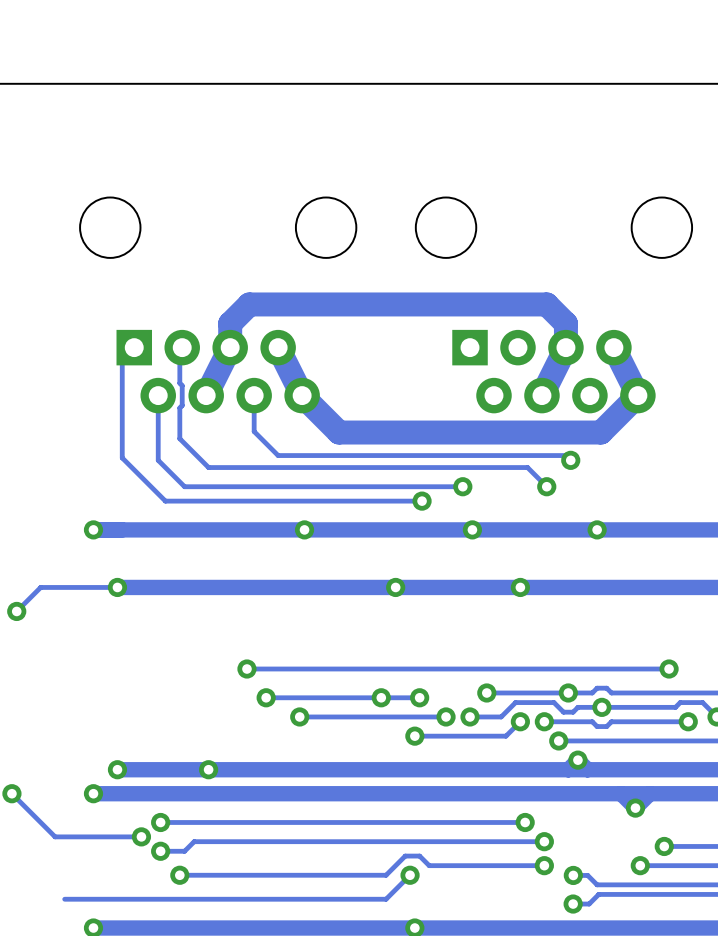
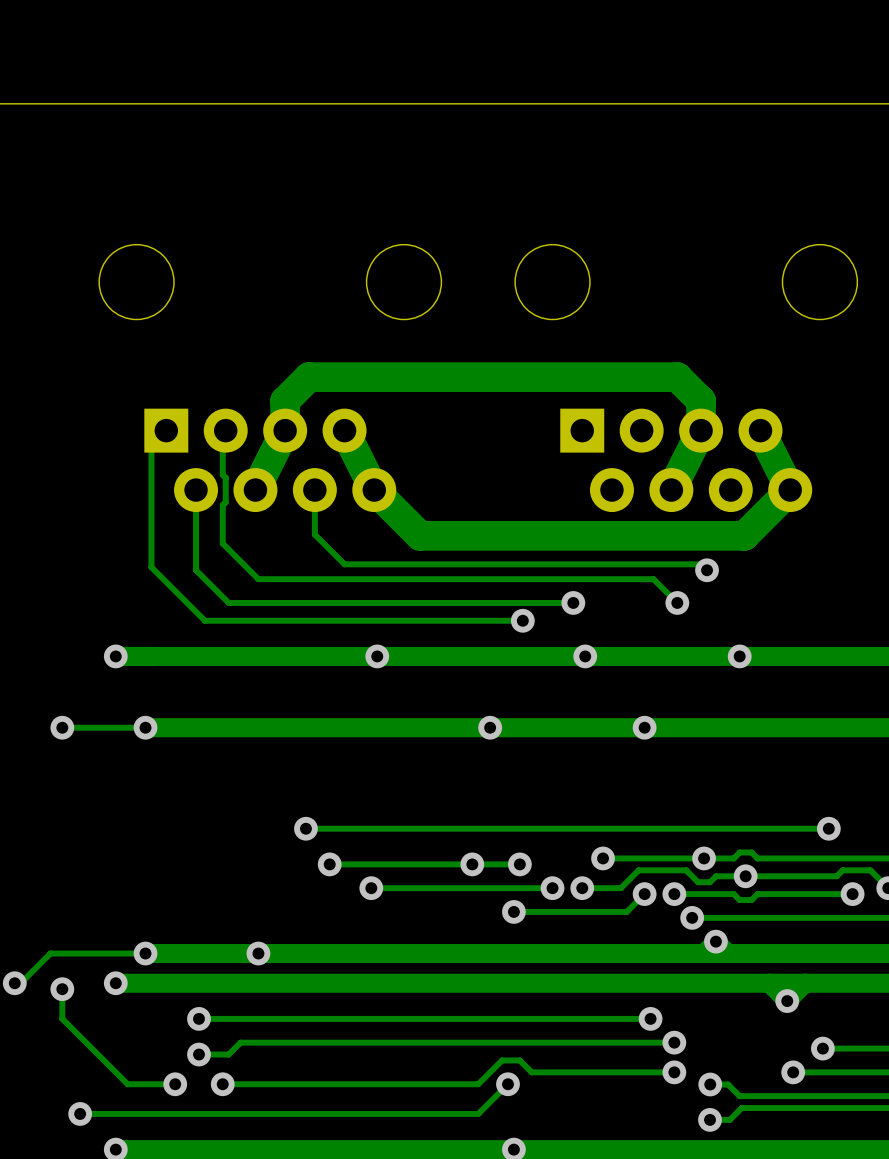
track: (50, 587) (40, 587) (16, 611) -> none
via position: (16, 611) -> (62, 727)
track: none -> (145, 953) (50, 953) (14, 989)
track: (11, 793) (55, 836) (141, 836) -> none
track: none -> (62, 989) (62, 1018) (127, 1084) (175, 1084)
via: none -> (62, 989)
via position: (141, 836) -> (175, 1084)
via: none -> (80, 1113)

